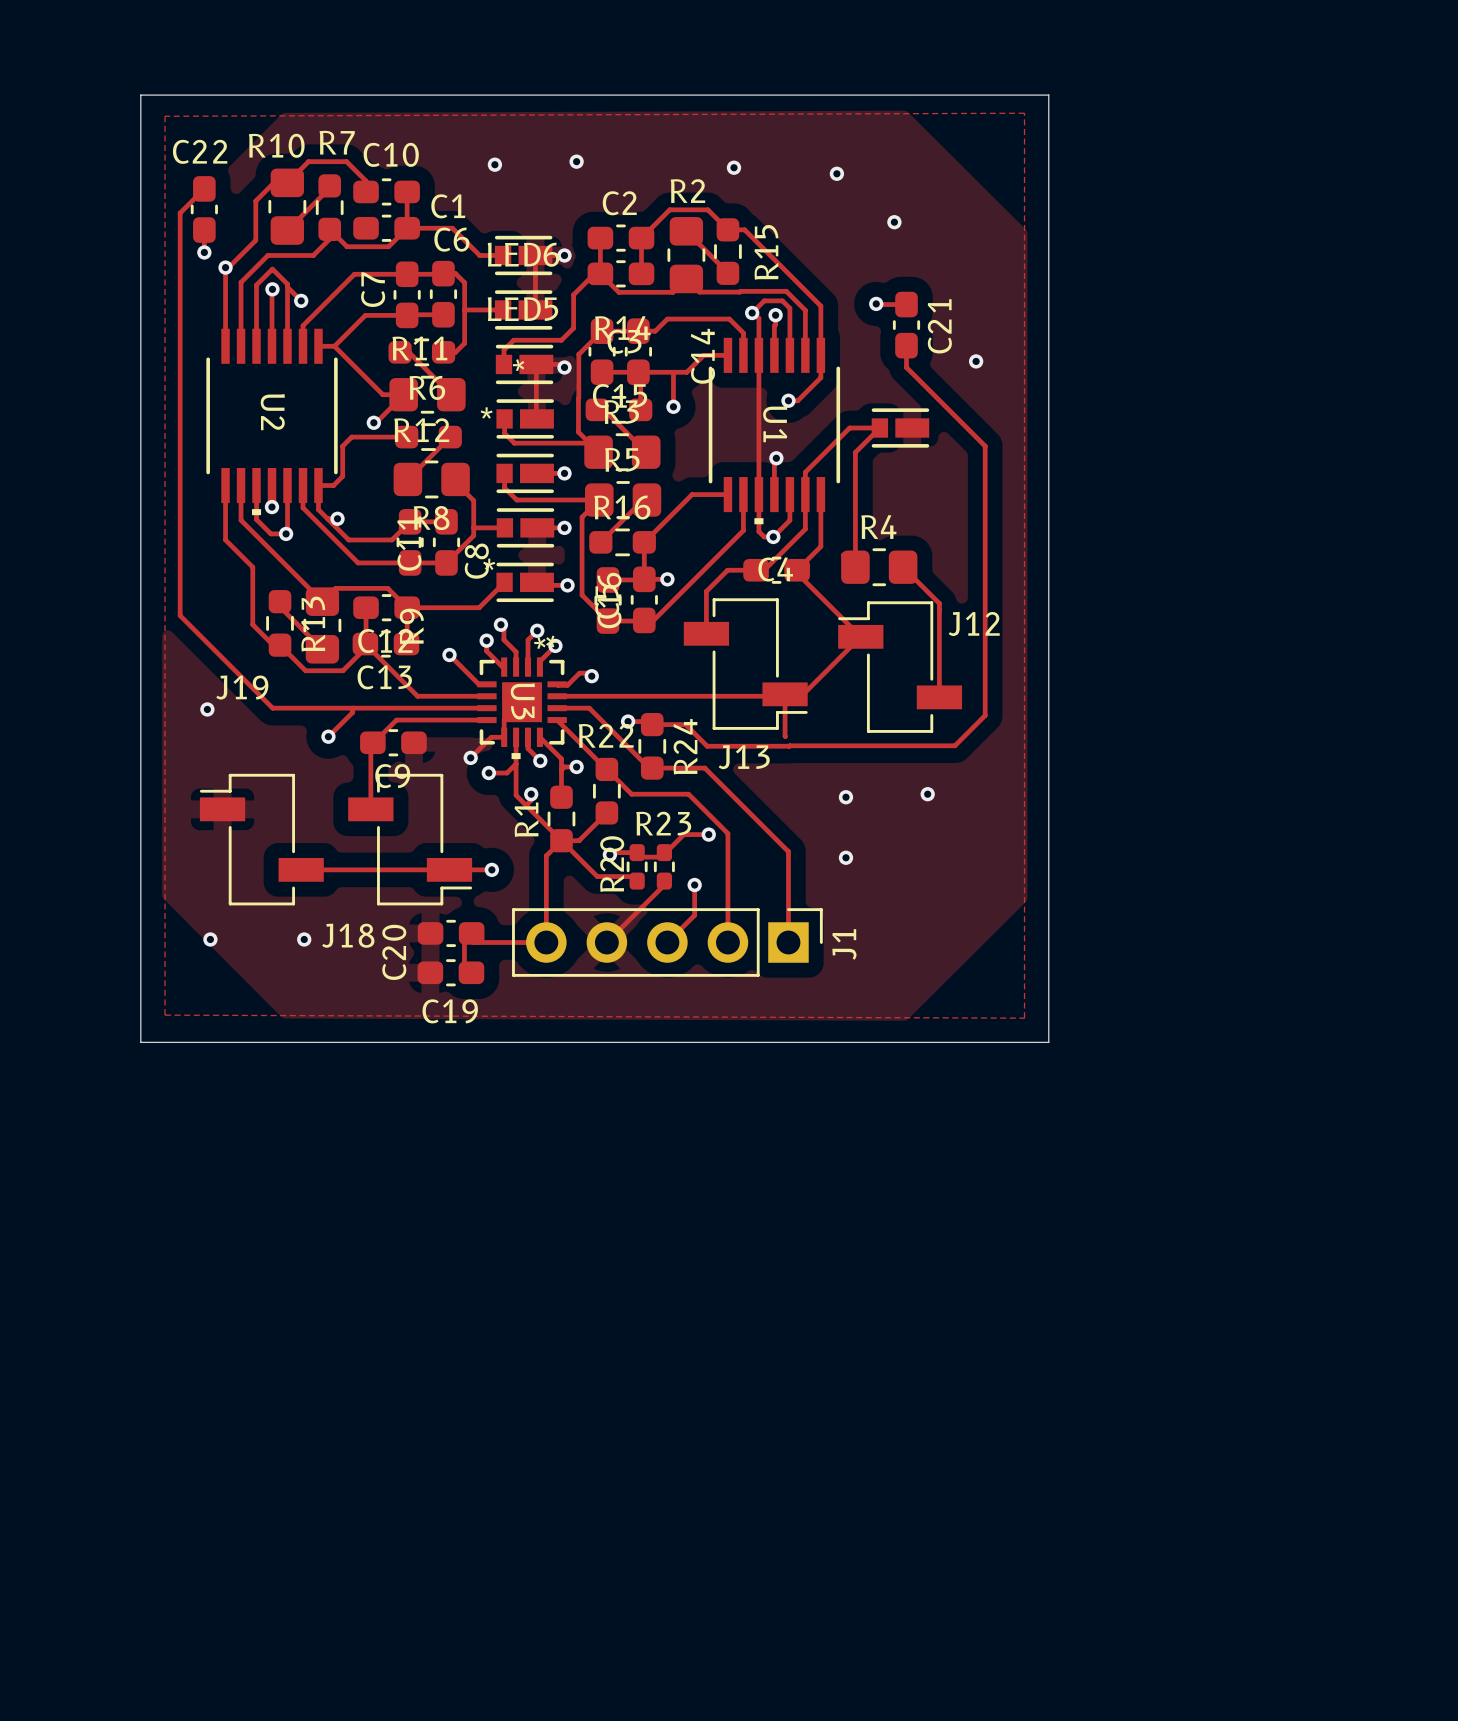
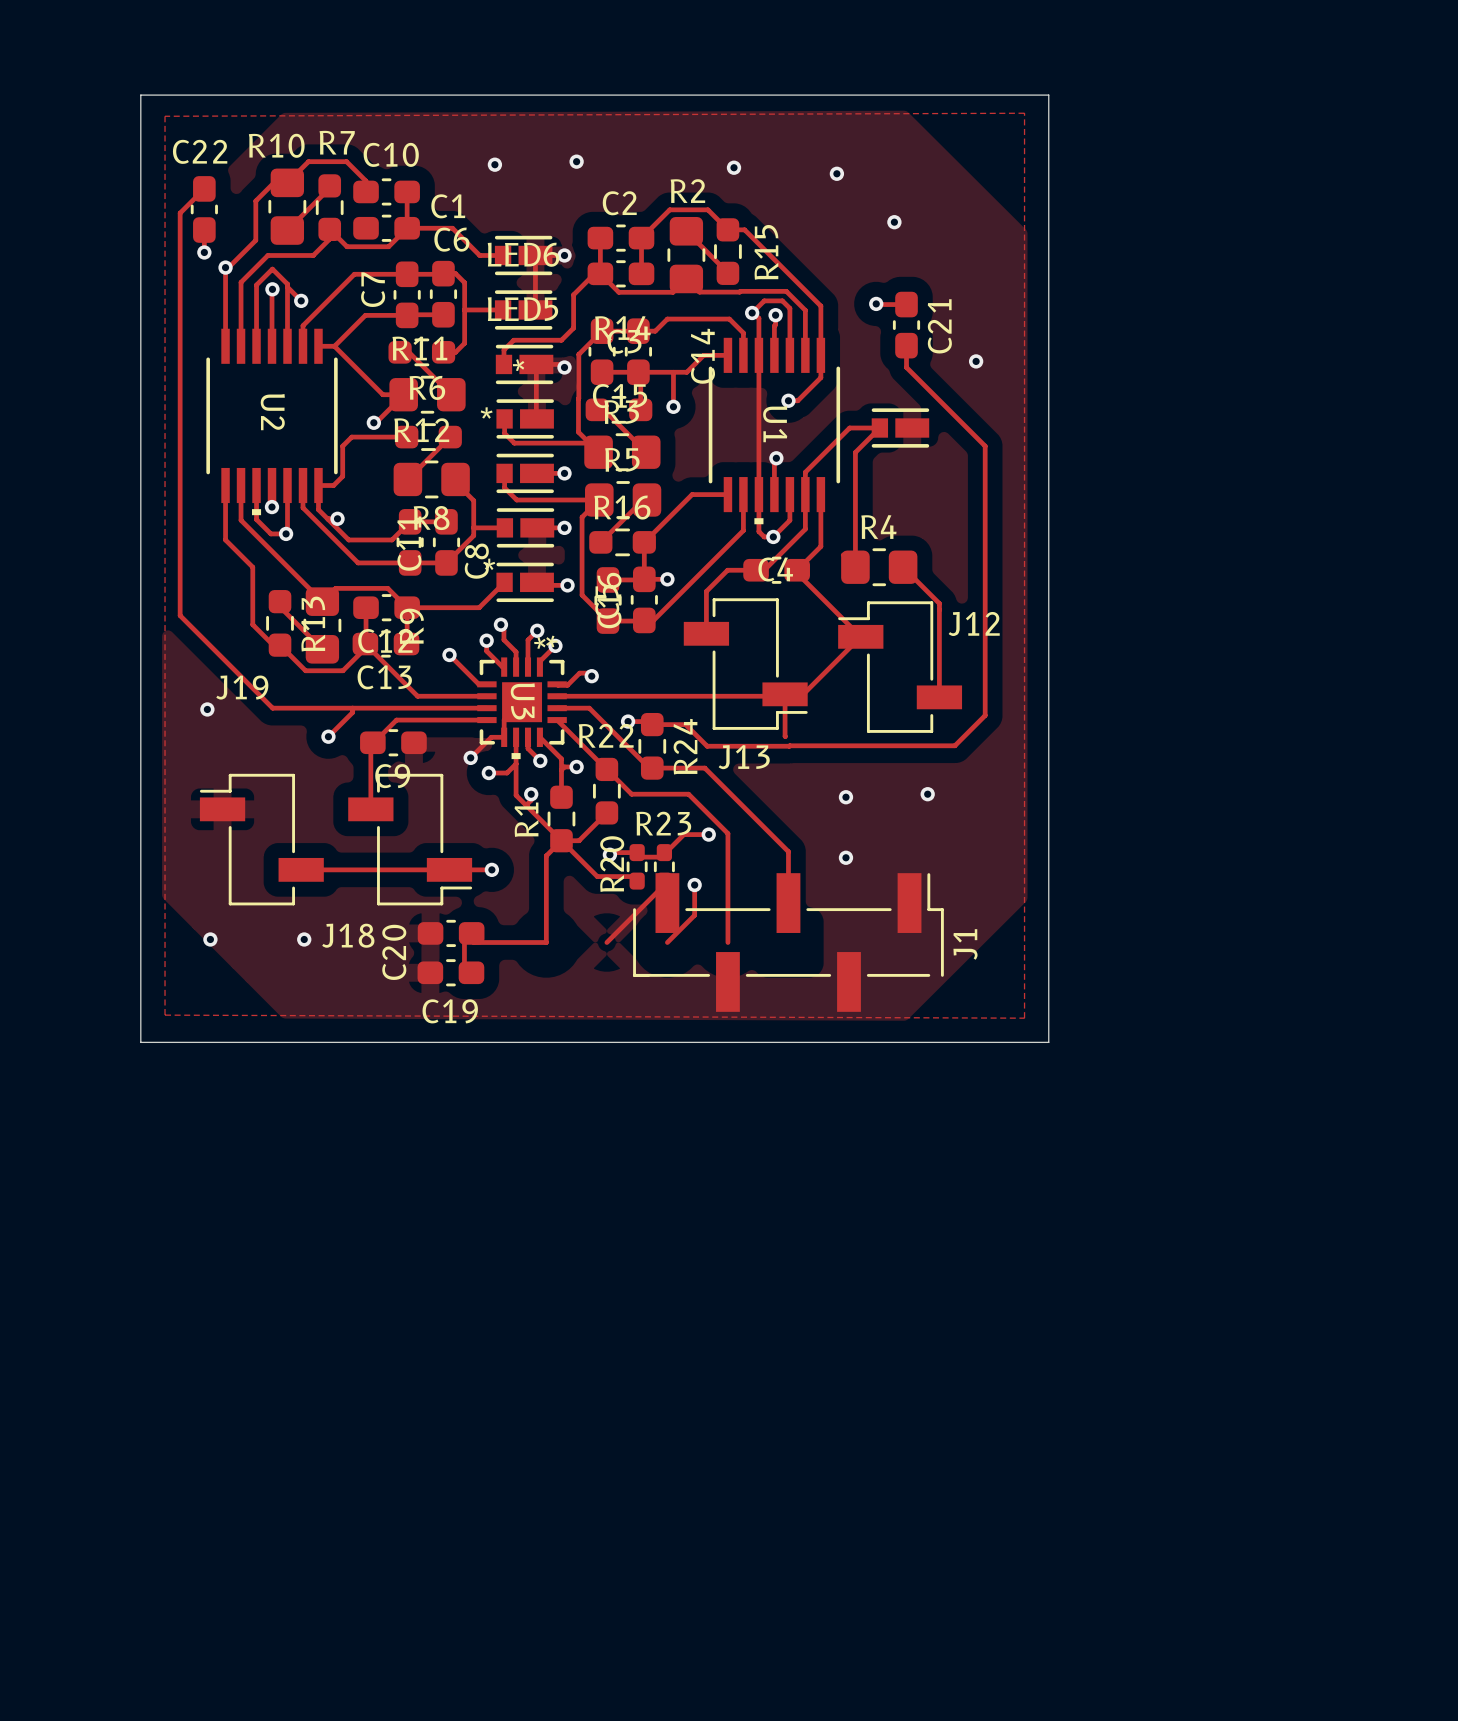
J1 footprint: [512, 908, 823, 977] -> [633, 873, 944, 1012]

